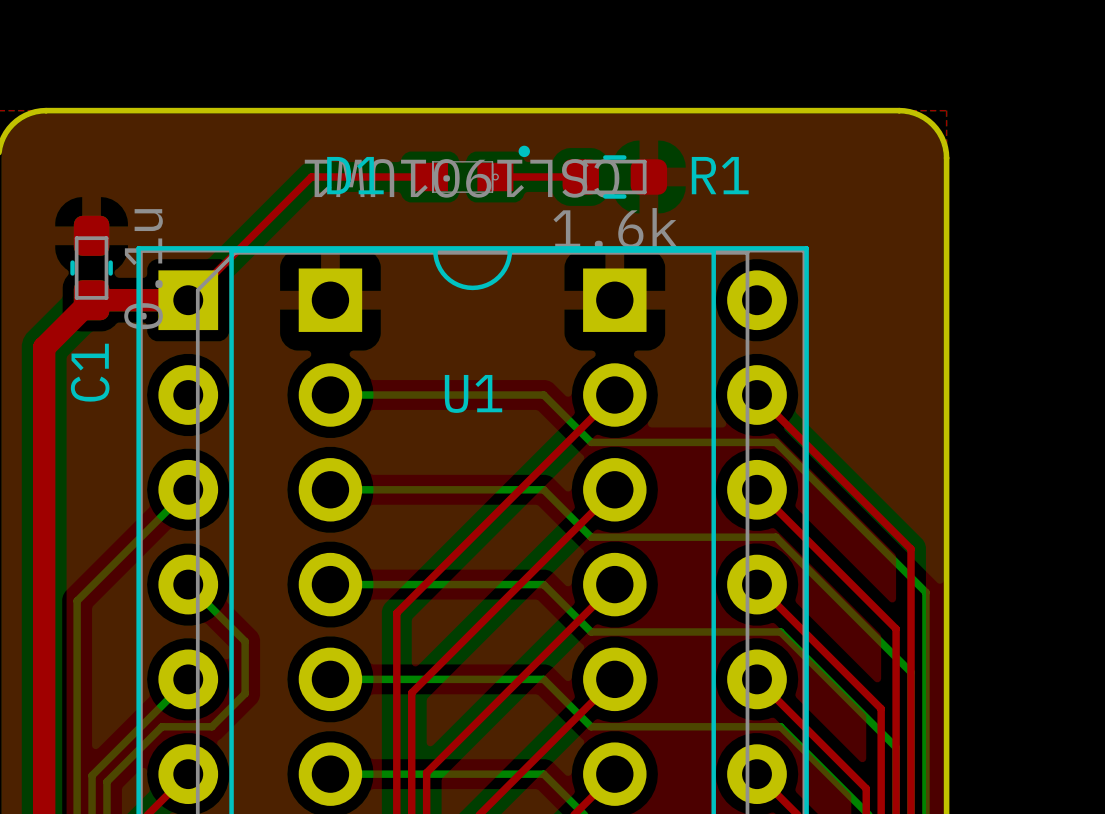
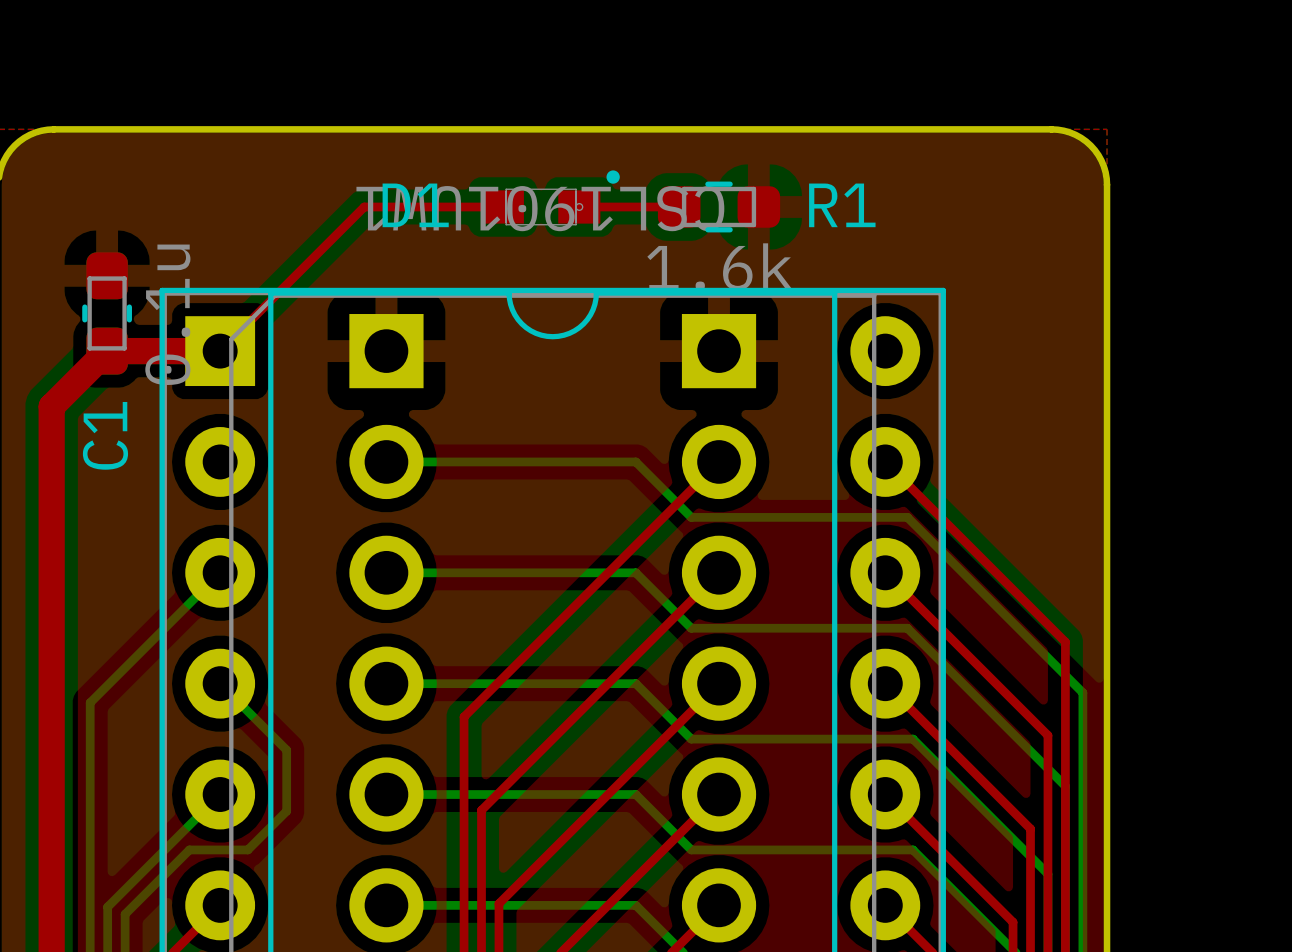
U1 name: U1 (473, 393) -> none

